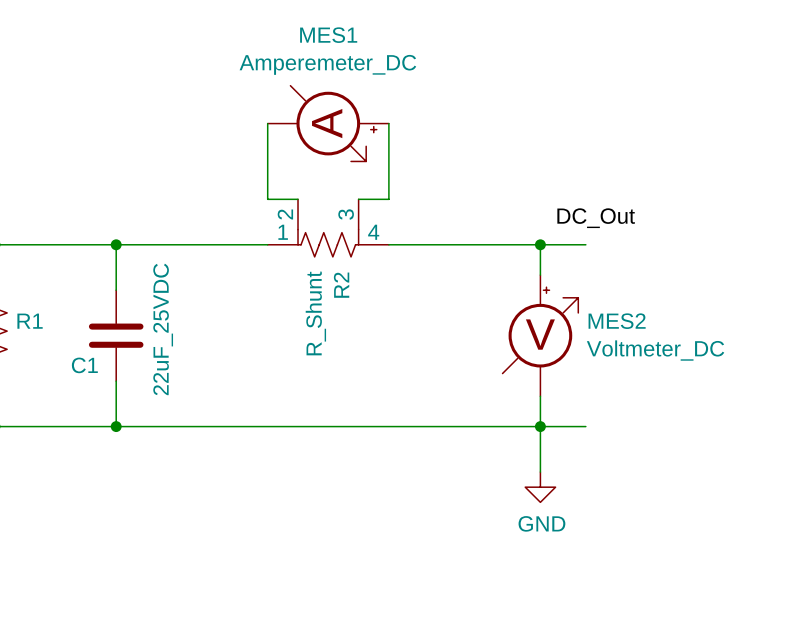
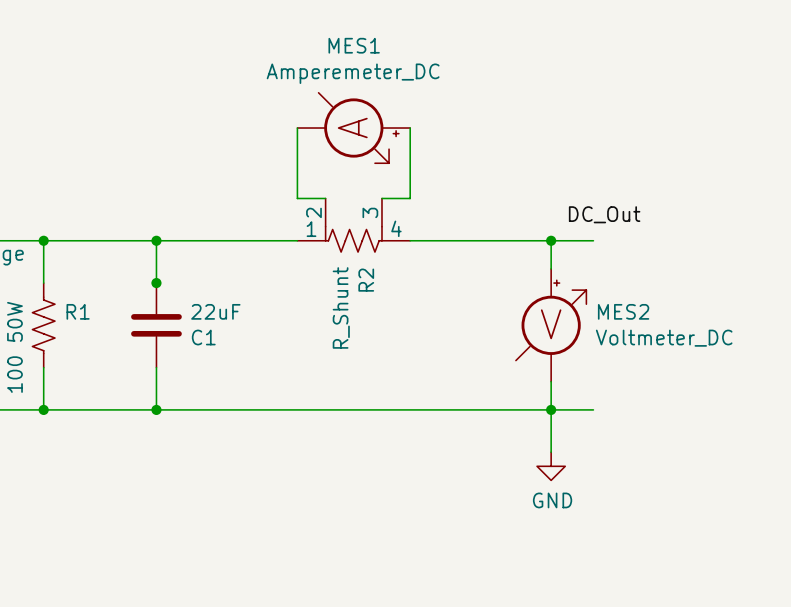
junction: none -> (156, 283)
22uF_25VDC name: 22uF_25VDC (163, 329) -> 22uF (215, 311)
22uF_25VDC value position: C1 (84, 365) -> C1 (203, 337)

